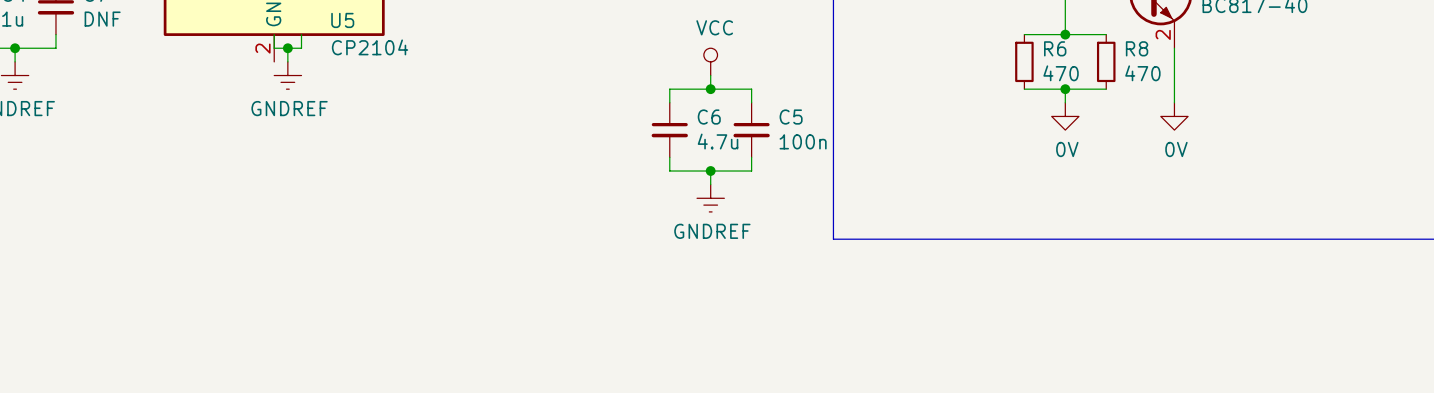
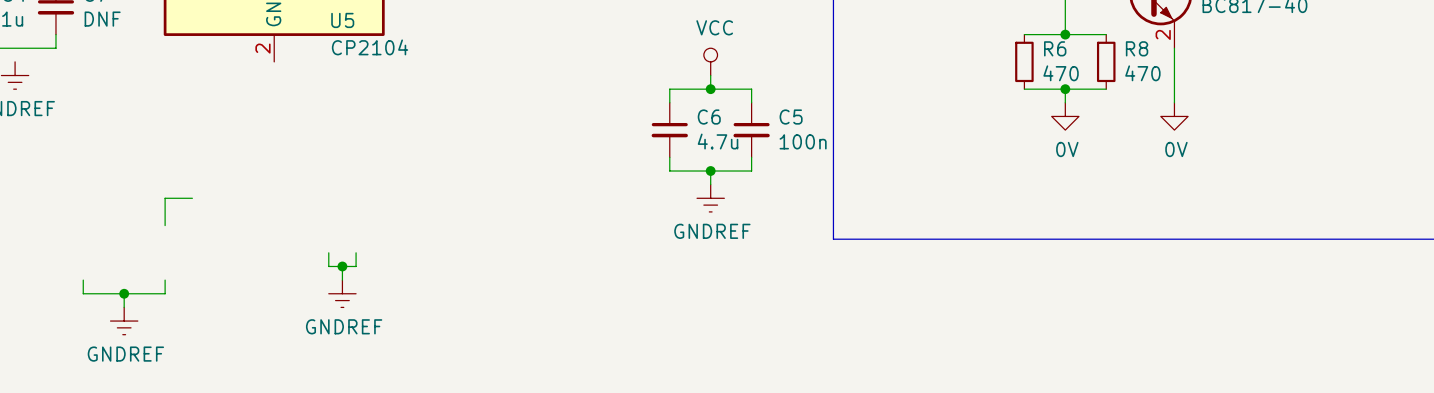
wire: (274, 34) (274, 48) (301, 48) (301, 34) -> (328, 252) (328, 266) (356, 266) (356, 252)
wire: (15, 48) (15, 61) -> none
junction: (15, 48) -> none
wire: (287, 48) (287, 61) -> (342, 266) (342, 280)
junction: (287, 48) -> none
power symbol: GNDREF (287, 75) -> none
wire: none -> (192, 198) (165, 198) (165, 225)
junction: none -> (342, 266)
wire: none -> (83, 280) (83, 293) (165, 293) (165, 280)
wire: none -> (124, 293) (124, 307)
junction: none -> (124, 293)
power symbol: none -> GNDREF (342, 293)
power symbol: none -> GNDREF (124, 321)

